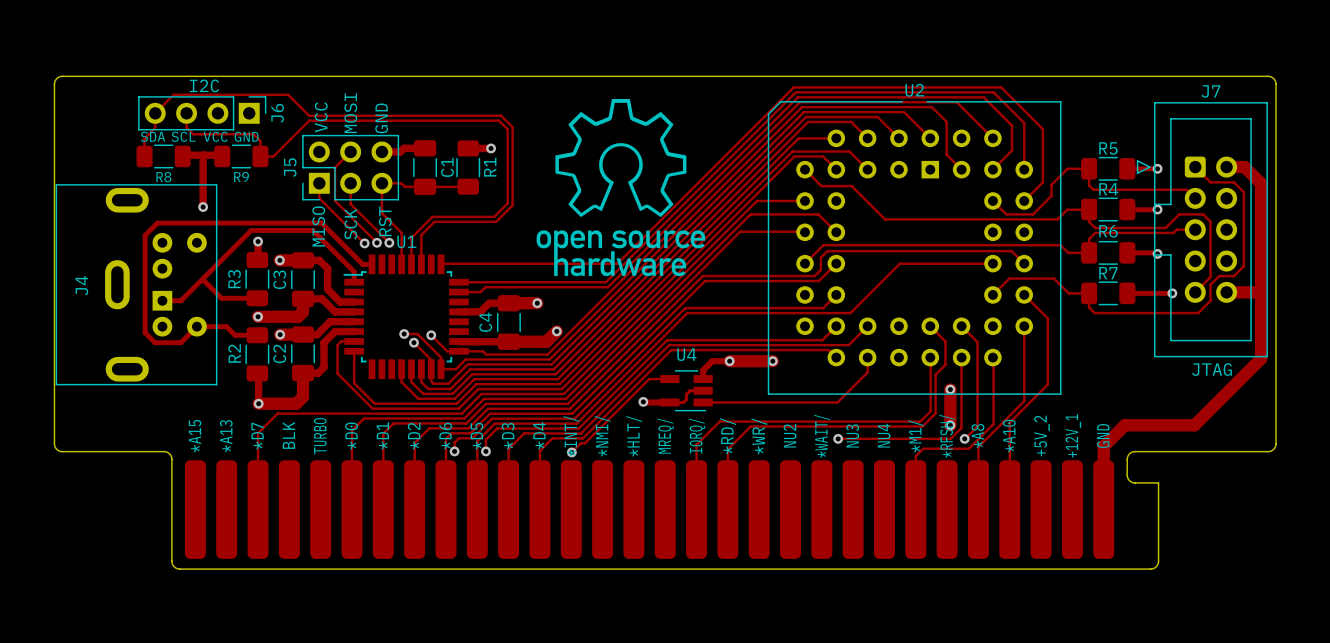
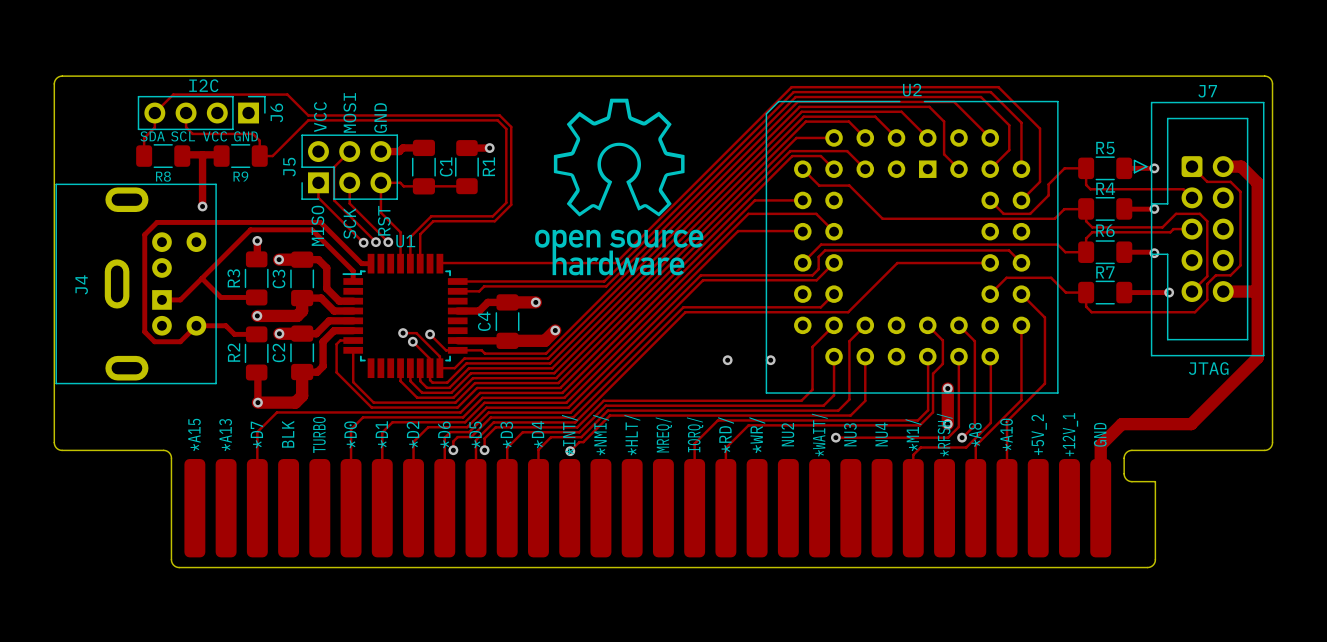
track: (822, 340) (667, 340) (605, 401) -> (820, 339) (812, 346) (812, 389) (801, 400) (603, 400)
track: (851, 342) (848, 345) (669, 345) (607, 406) -> (849, 341) (849, 399) (838, 410) (607, 410)
track: (836, 357) (828, 350) (671, 350) (609, 411) -> (834, 356) (834, 395) (823, 405) (605, 405)
track: (772, 361) (712, 361) (703, 370) (703, 379) -> none
track: (867, 372) (837, 402) (703, 402) -> (865, 371) (865, 400) (850, 415) (609, 415)
track: (669, 379) (649, 379) (611, 416) -> none
U4: (686, 390) -> none
track: (703, 390) (690, 390) (683, 402) (643, 401) -> none
via: (643, 401) -> none

